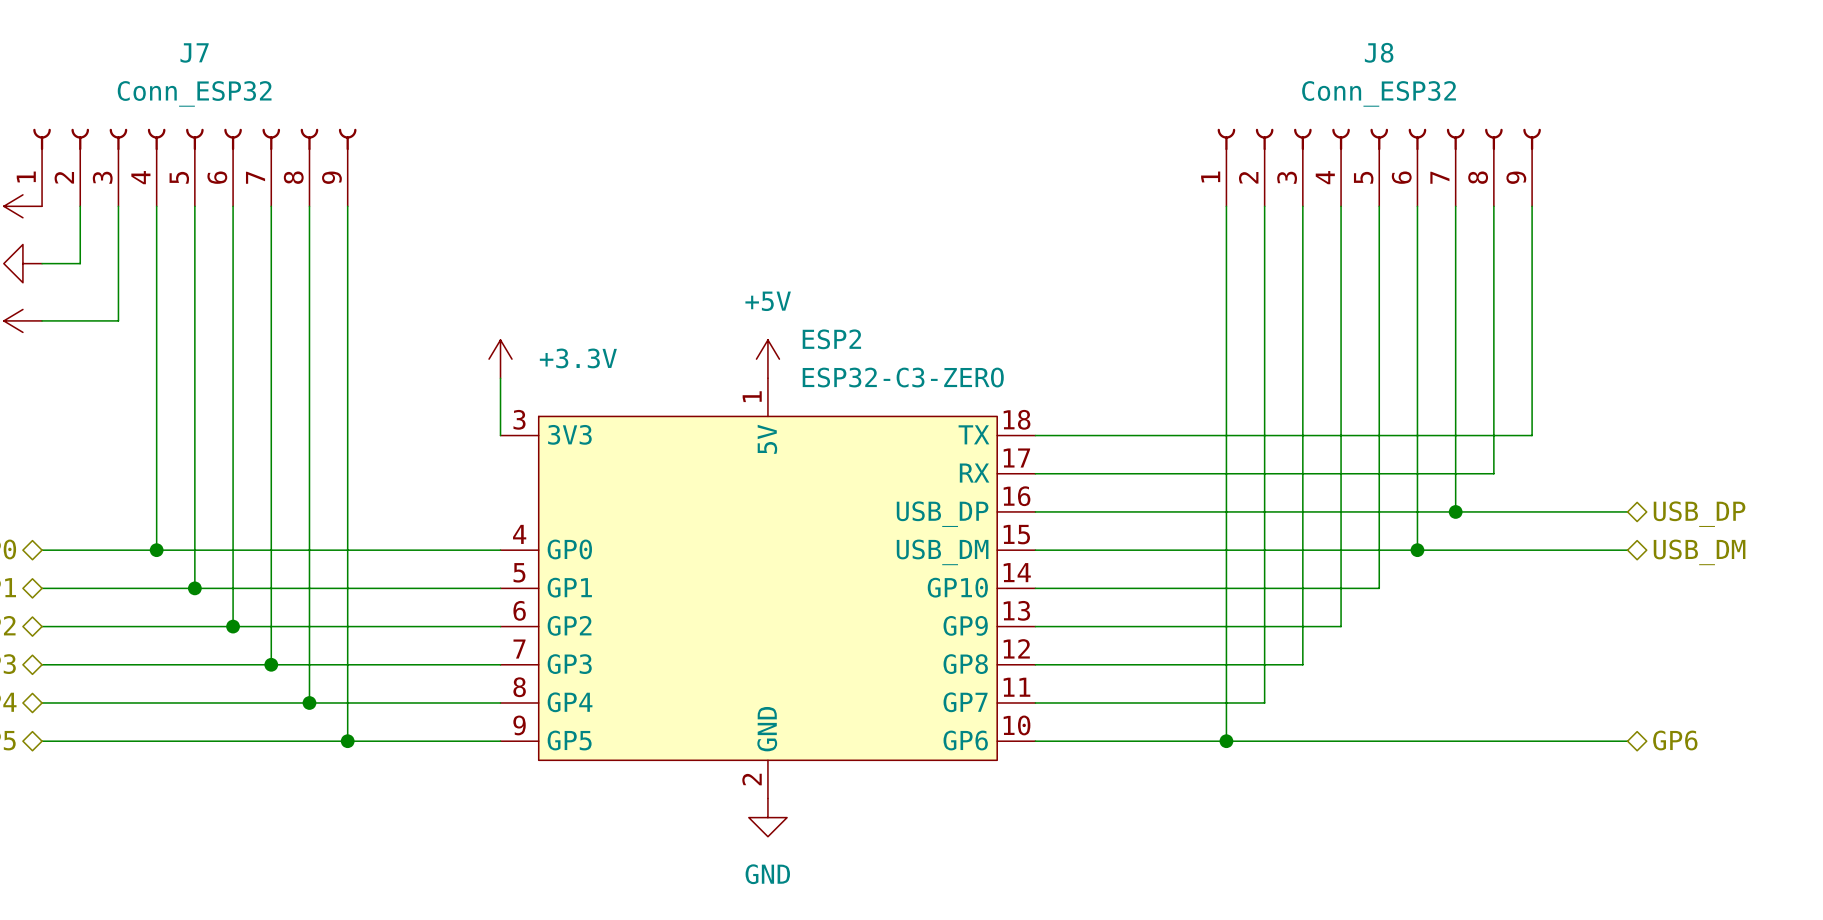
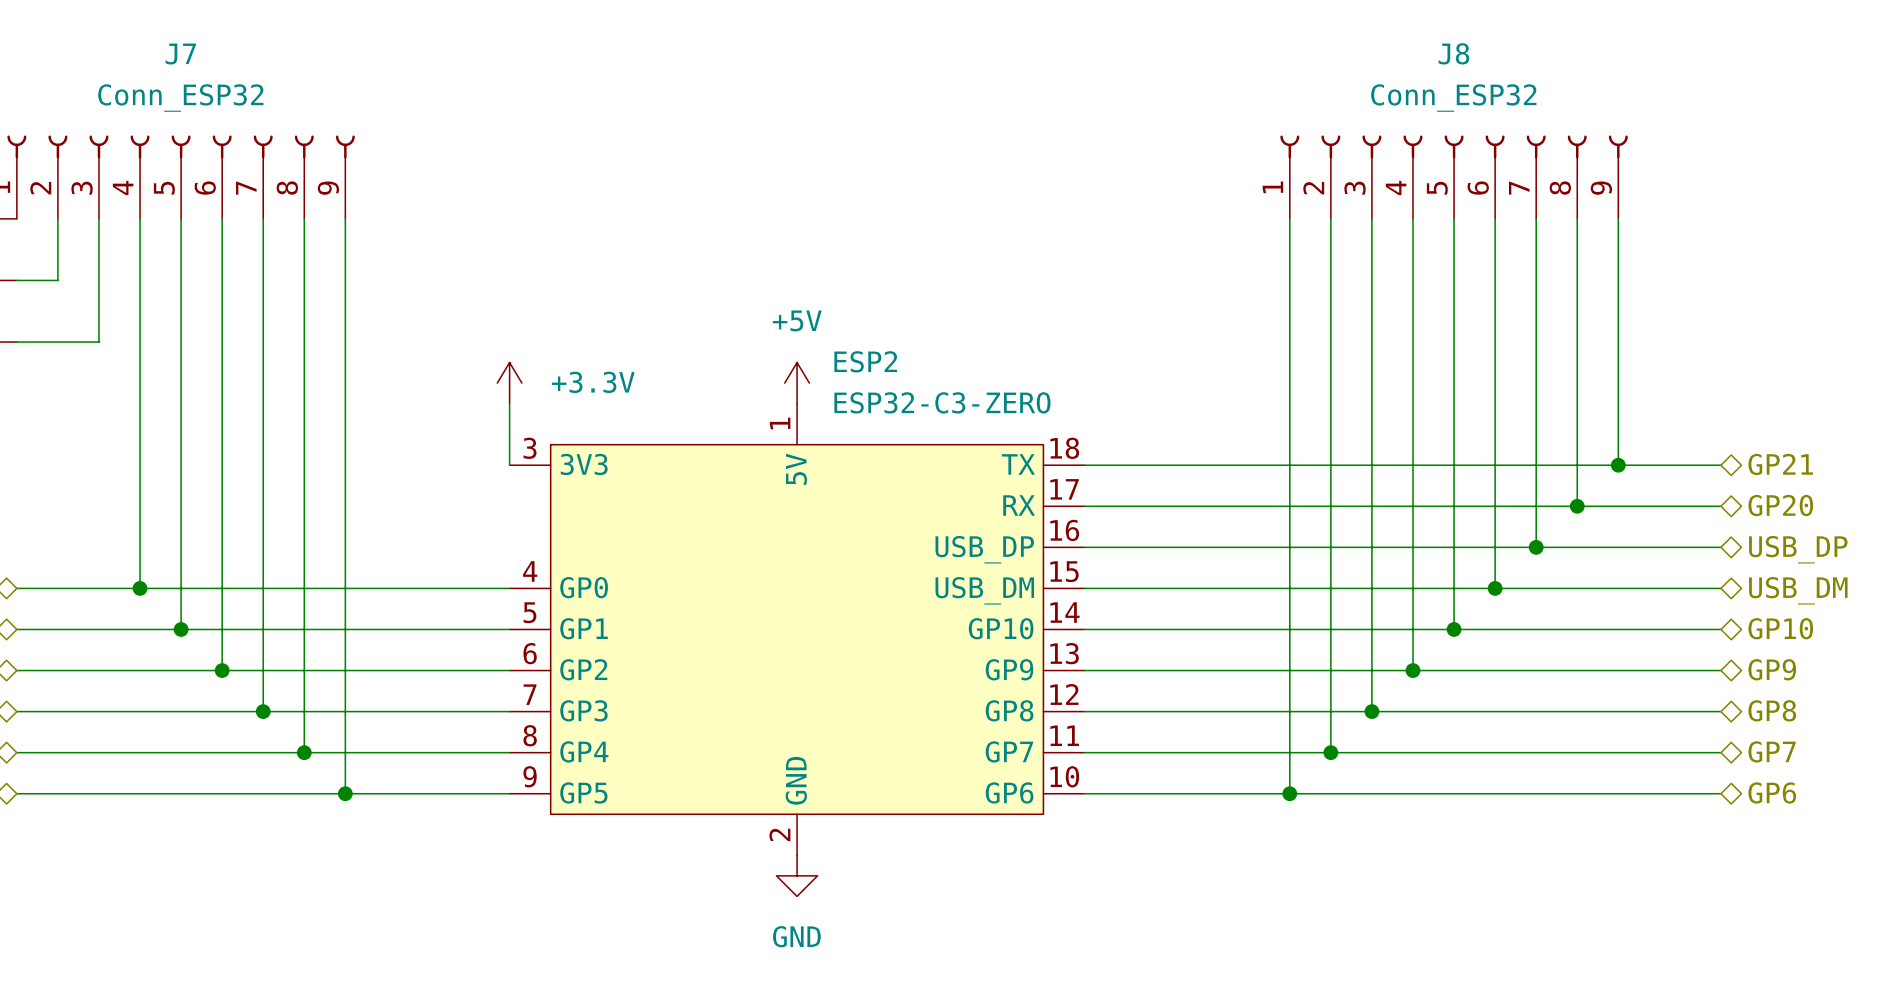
hierarchical label: none -> GP21 (1780, 464)
wire: none -> (1618, 465) (1720, 465)
junction: none -> (1618, 465)
wire: none -> (1577, 506) (1720, 506)
junction: none -> (1577, 506)
hierarchical label: none -> GP20 (1780, 505)
hierarchical label: none -> GP10 (1780, 628)
wire: none -> (1454, 629) (1720, 629)
junction: none -> (1454, 629)
hierarchical label: none -> GP9 (1772, 669)
wire: none -> (1412, 670) (1720, 670)
junction: none -> (1412, 670)
wire: none -> (1371, 711) (1720, 711)
junction: none -> (1371, 711)
hierarchical label: none -> GP8 (1772, 710)
wire: none -> (1330, 752) (1720, 752)
junction: none -> (1330, 752)
hierarchical label: none -> GP7 (1772, 751)

